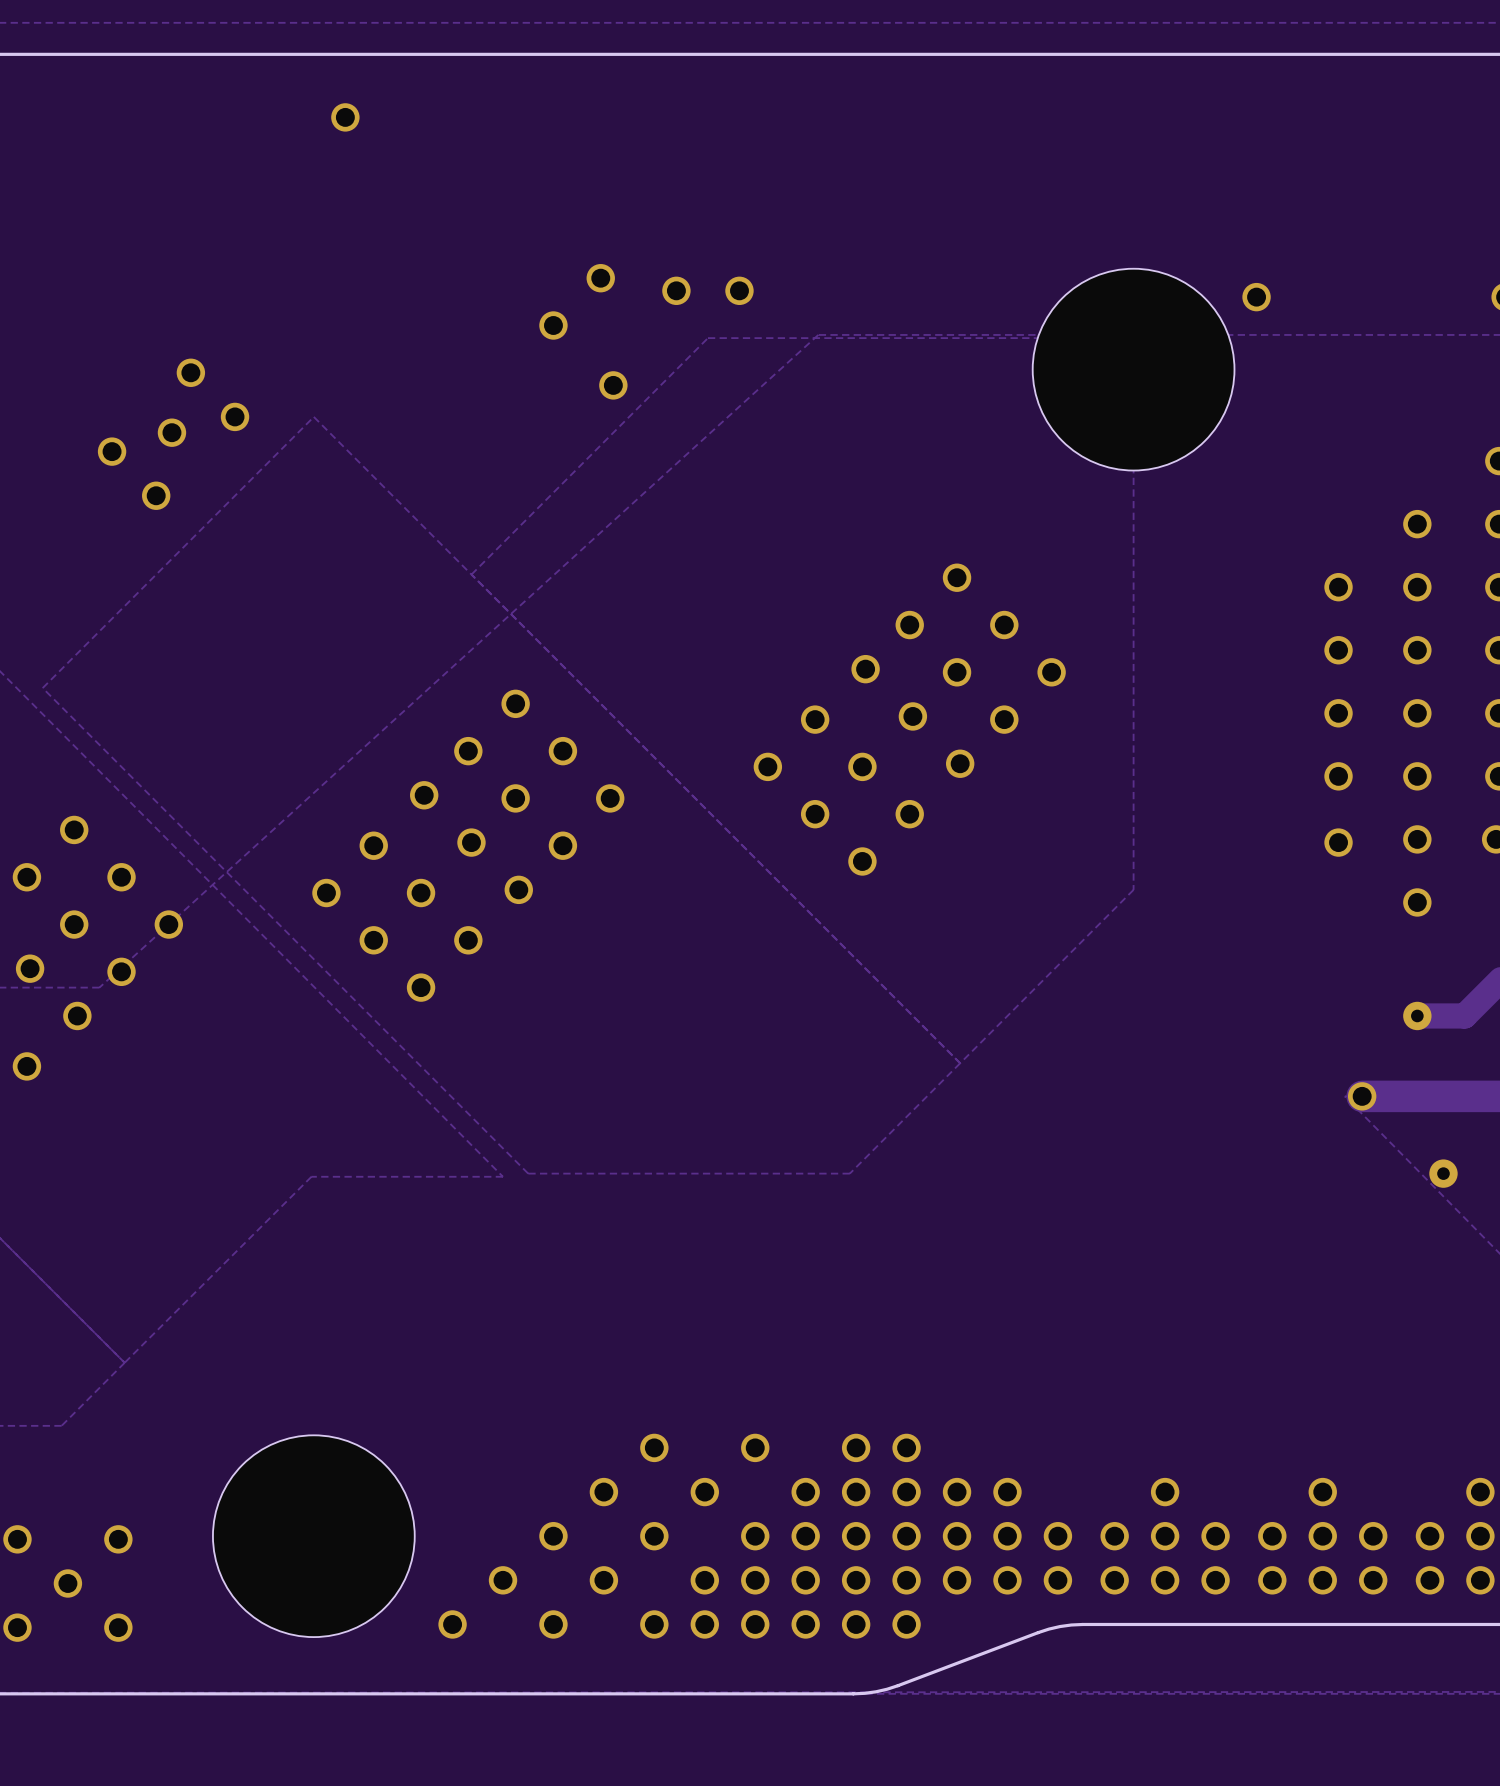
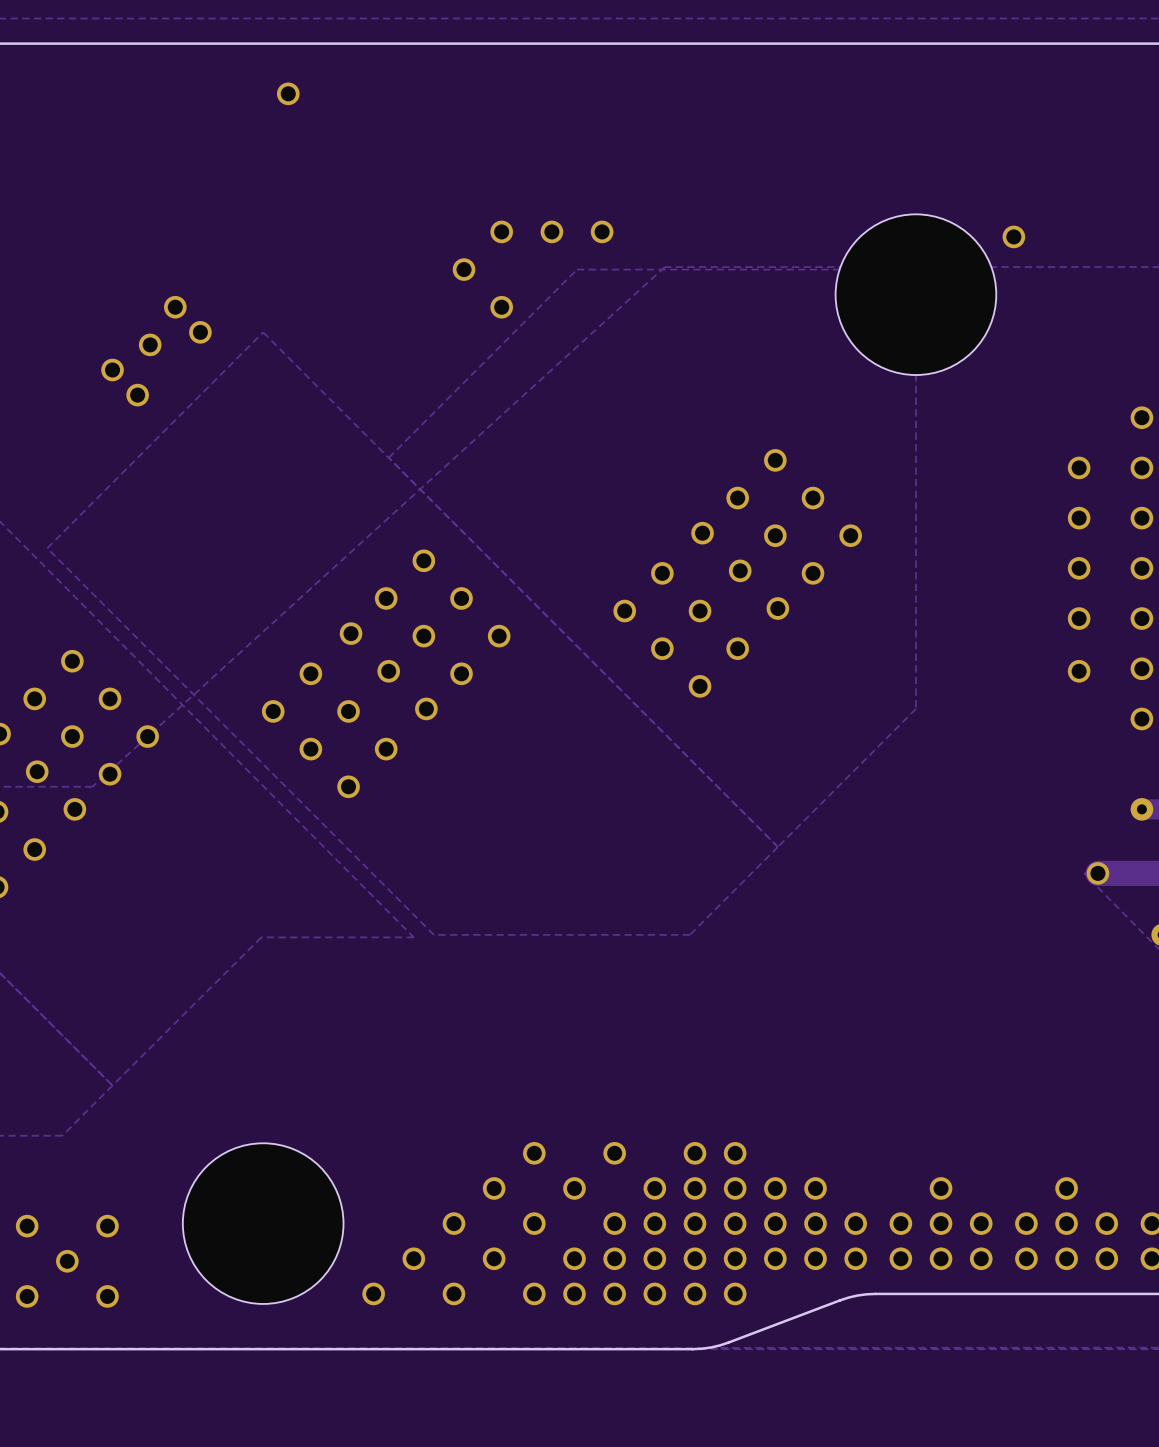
via position: (600, 278) -> (501, 231)
via position: (553, 325) -> (464, 269)
via position: (190, 372) -> (175, 307)
via position: (112, 451) -> (112, 370)

